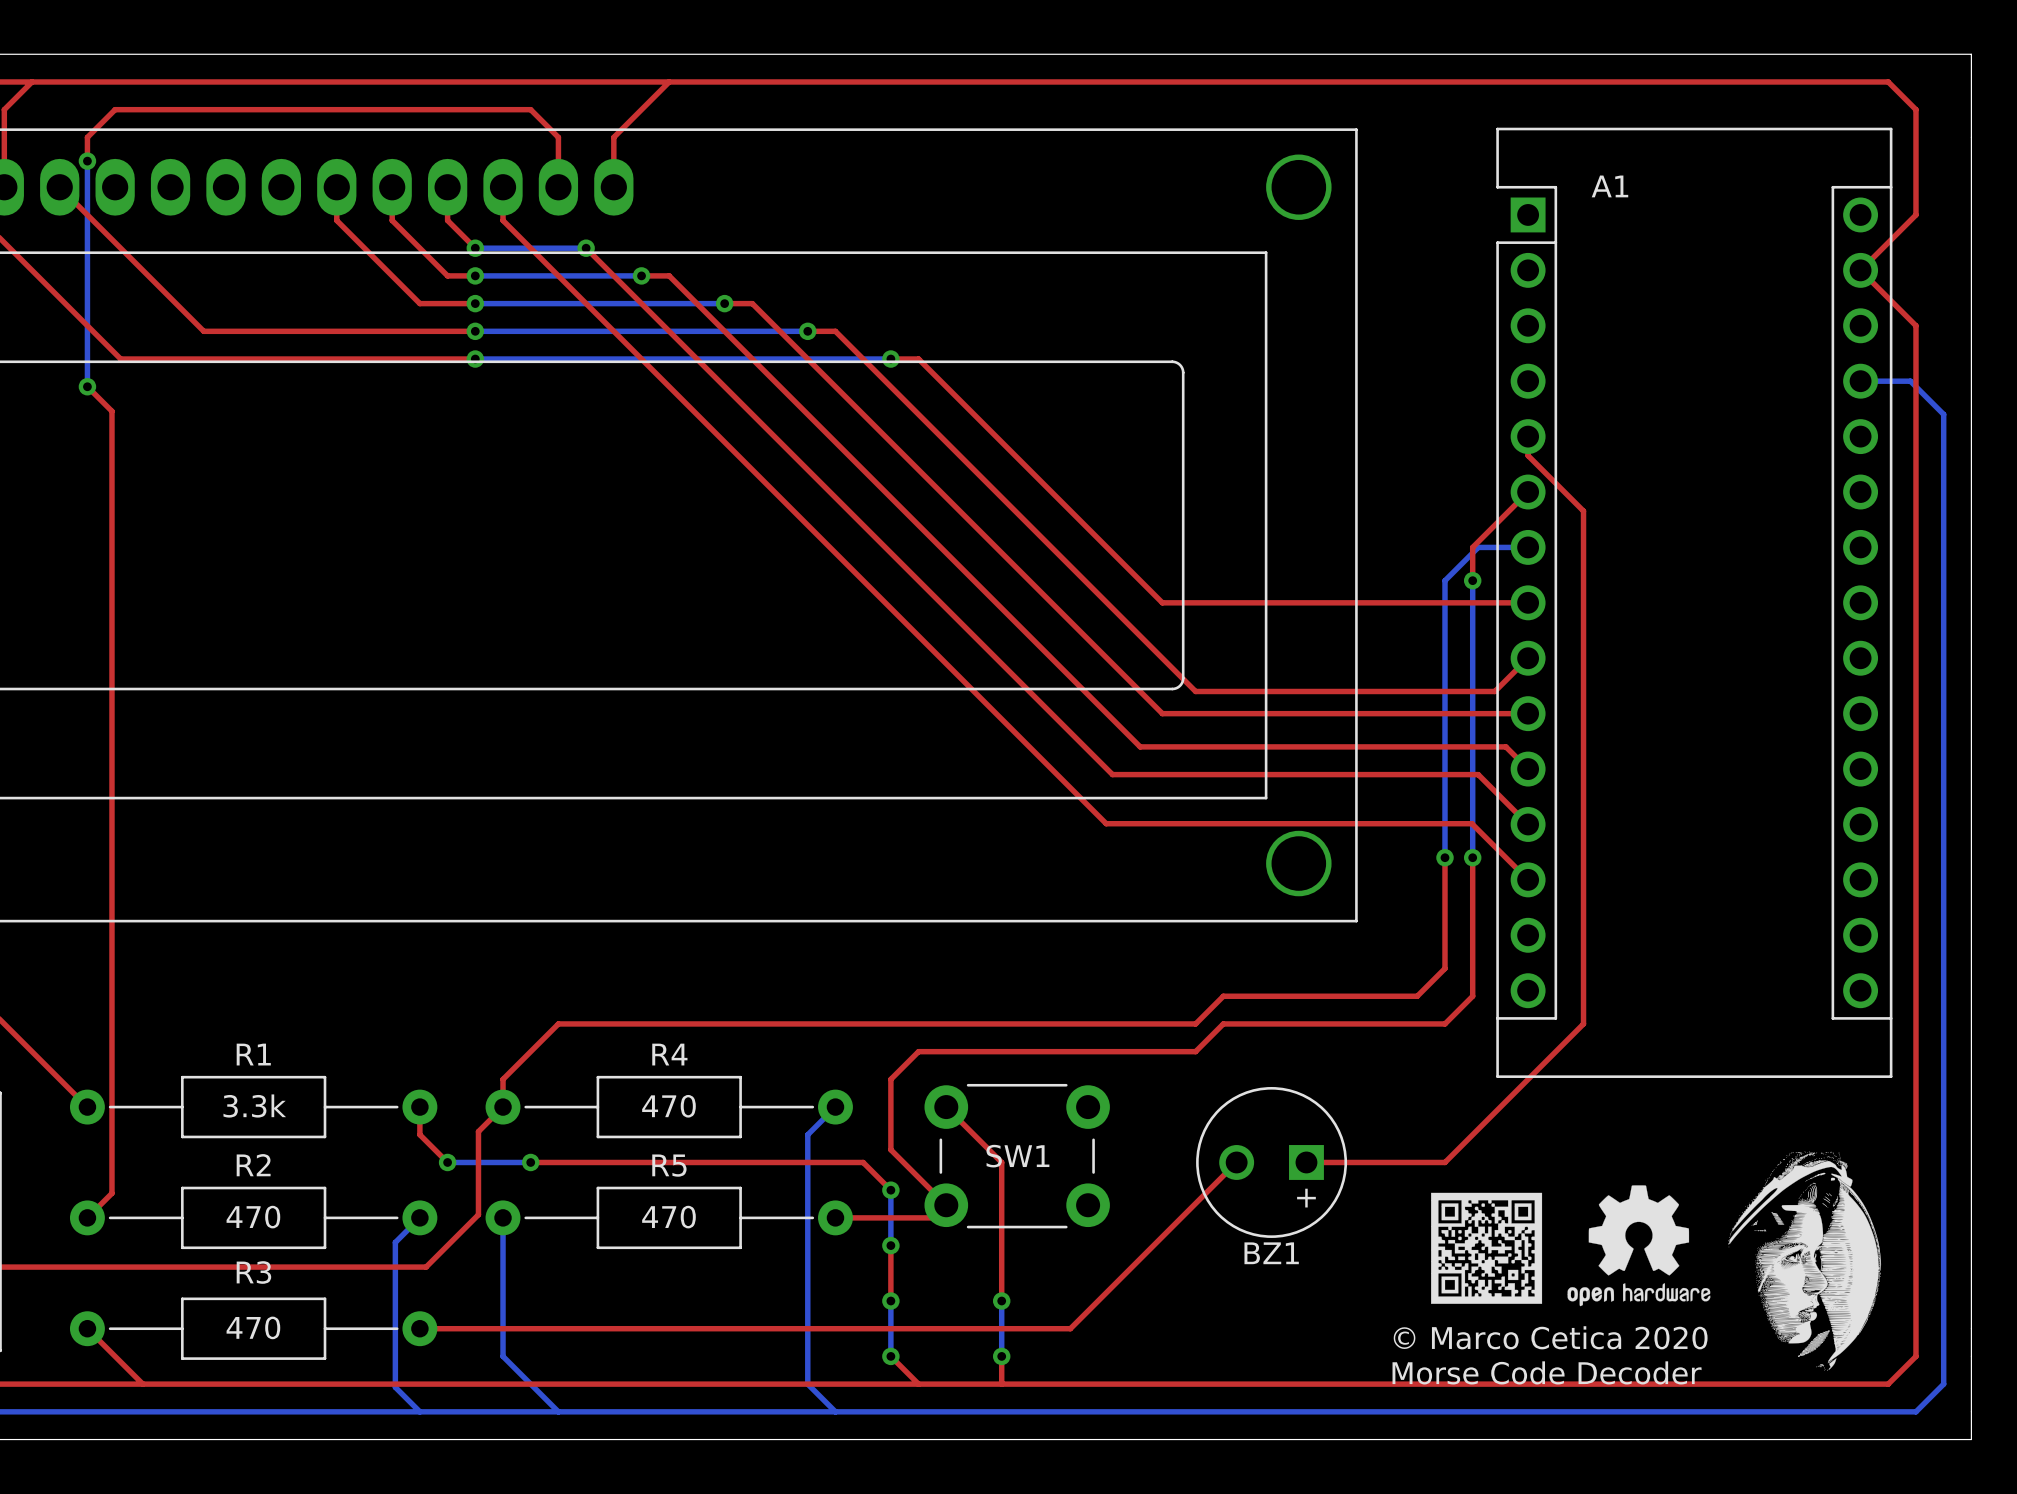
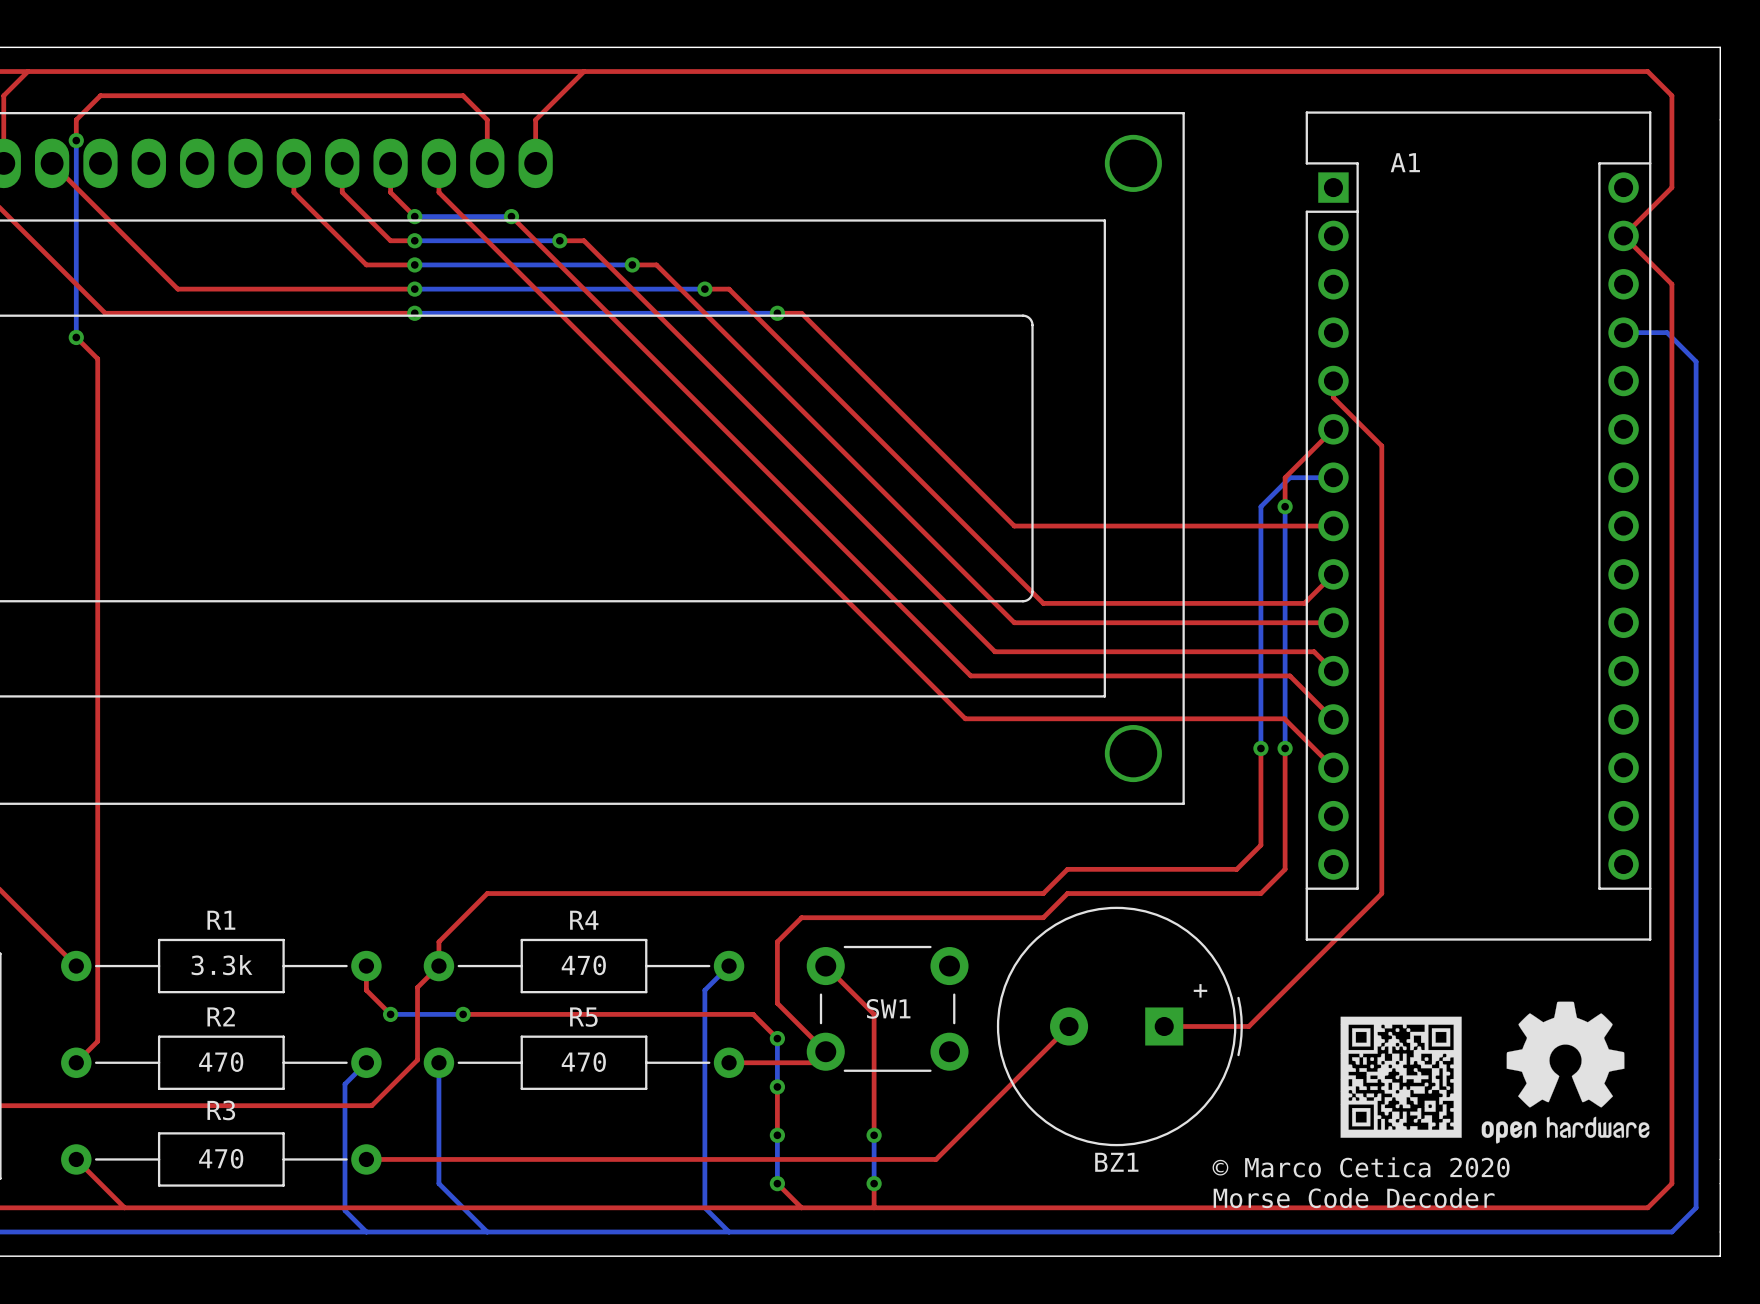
BZ1 footprint: [1196, 1087, 1348, 1238] -> [996, 906, 1243, 1147]
text: none -> + (1200, 990)
drawing: none -> [1340, 1001, 1650, 1144]
drawing: [1431, 1151, 1882, 1371] -> none
top track: (1236, 1162) (1070, 1328) -> (1069, 1026) (934, 1159)
top track: (1306, 1162) (1444, 1162) -> (1164, 1026) (1248, 1026) (1260, 1014)
BZ1 name position: BZ1 (1271, 1253) -> BZ1 (1116, 1162)

